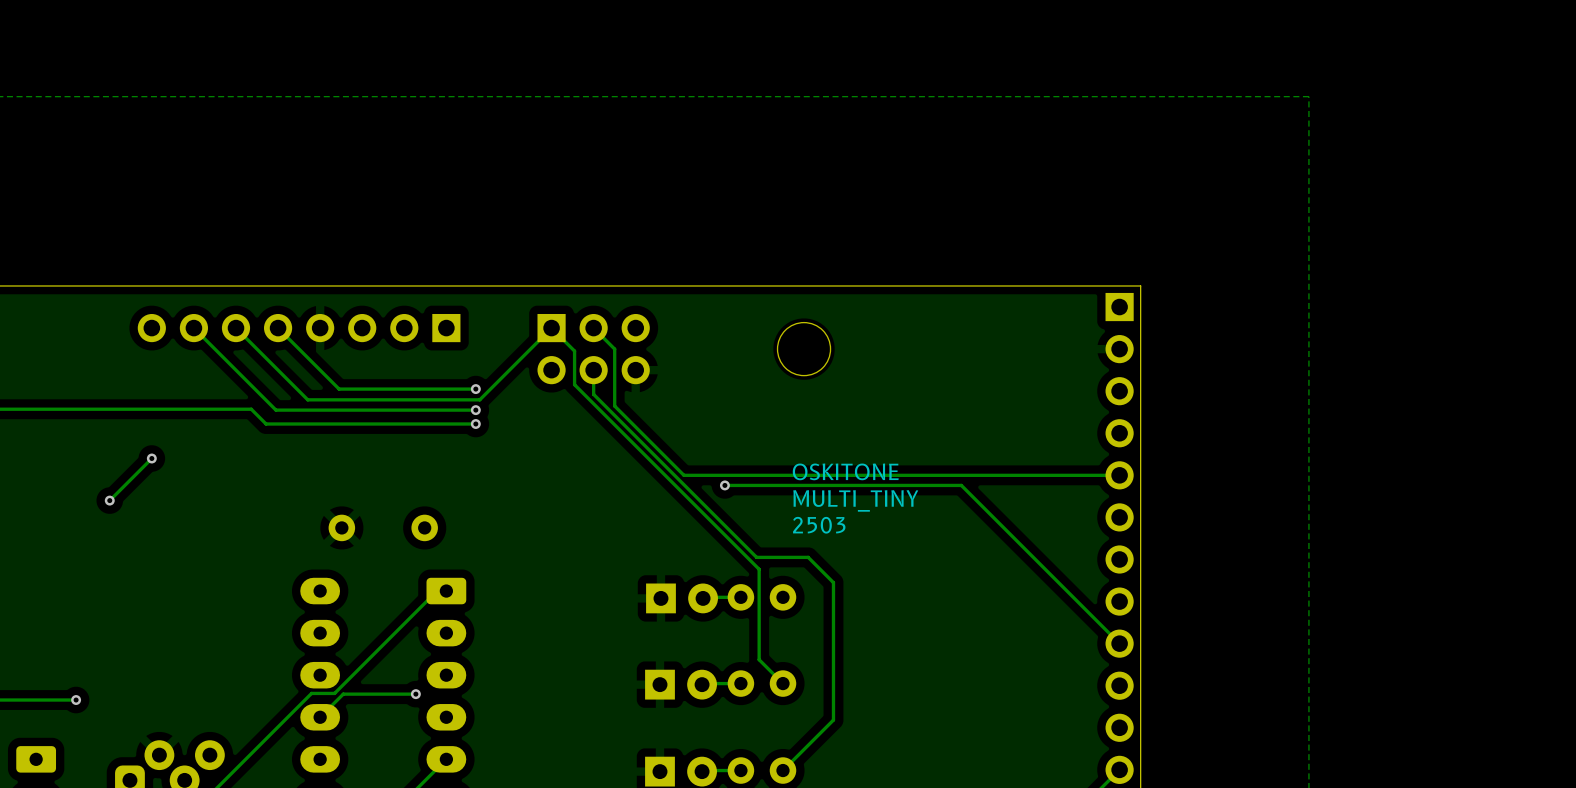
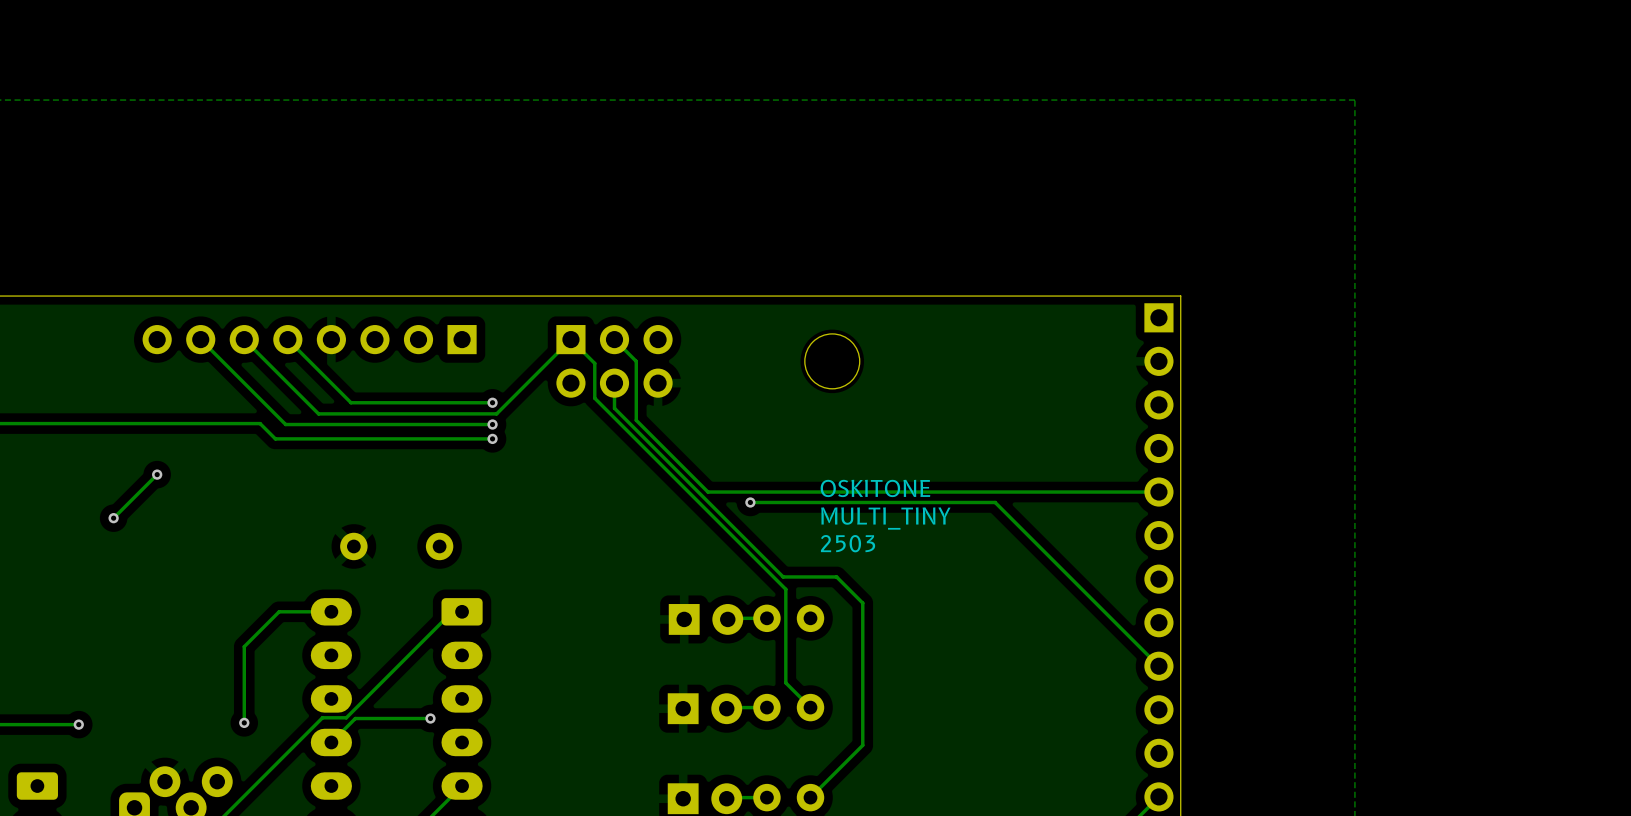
track: none -> (331, 611) (279, 611) (244, 646) (244, 722)
via: none -> (244, 722)

